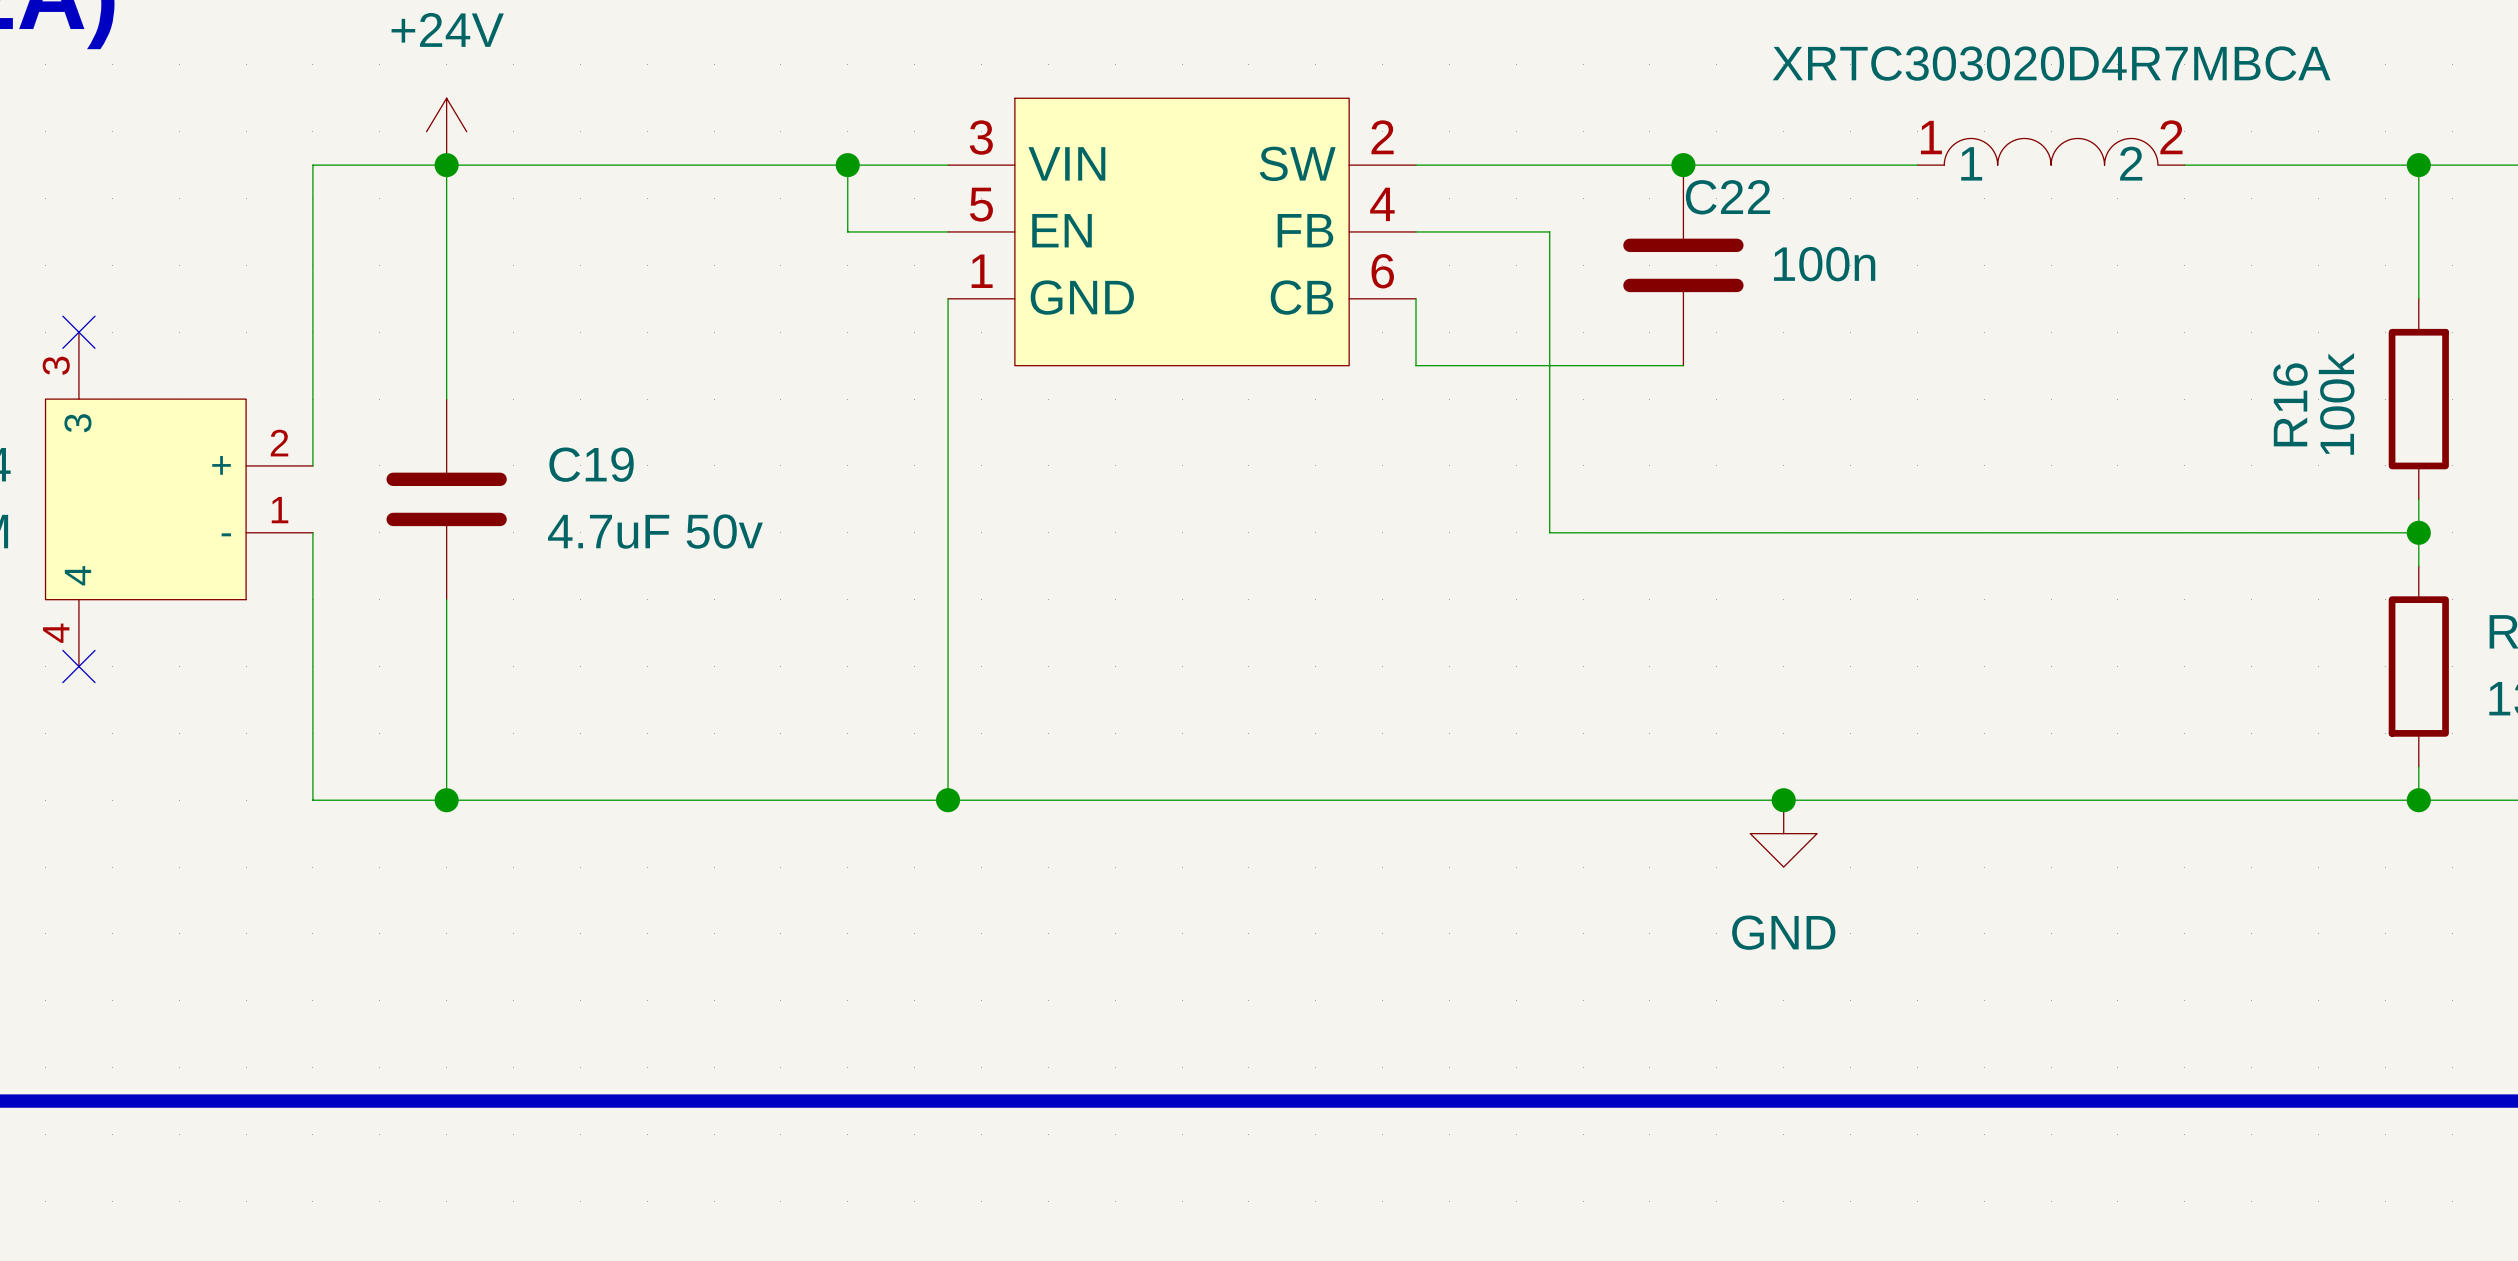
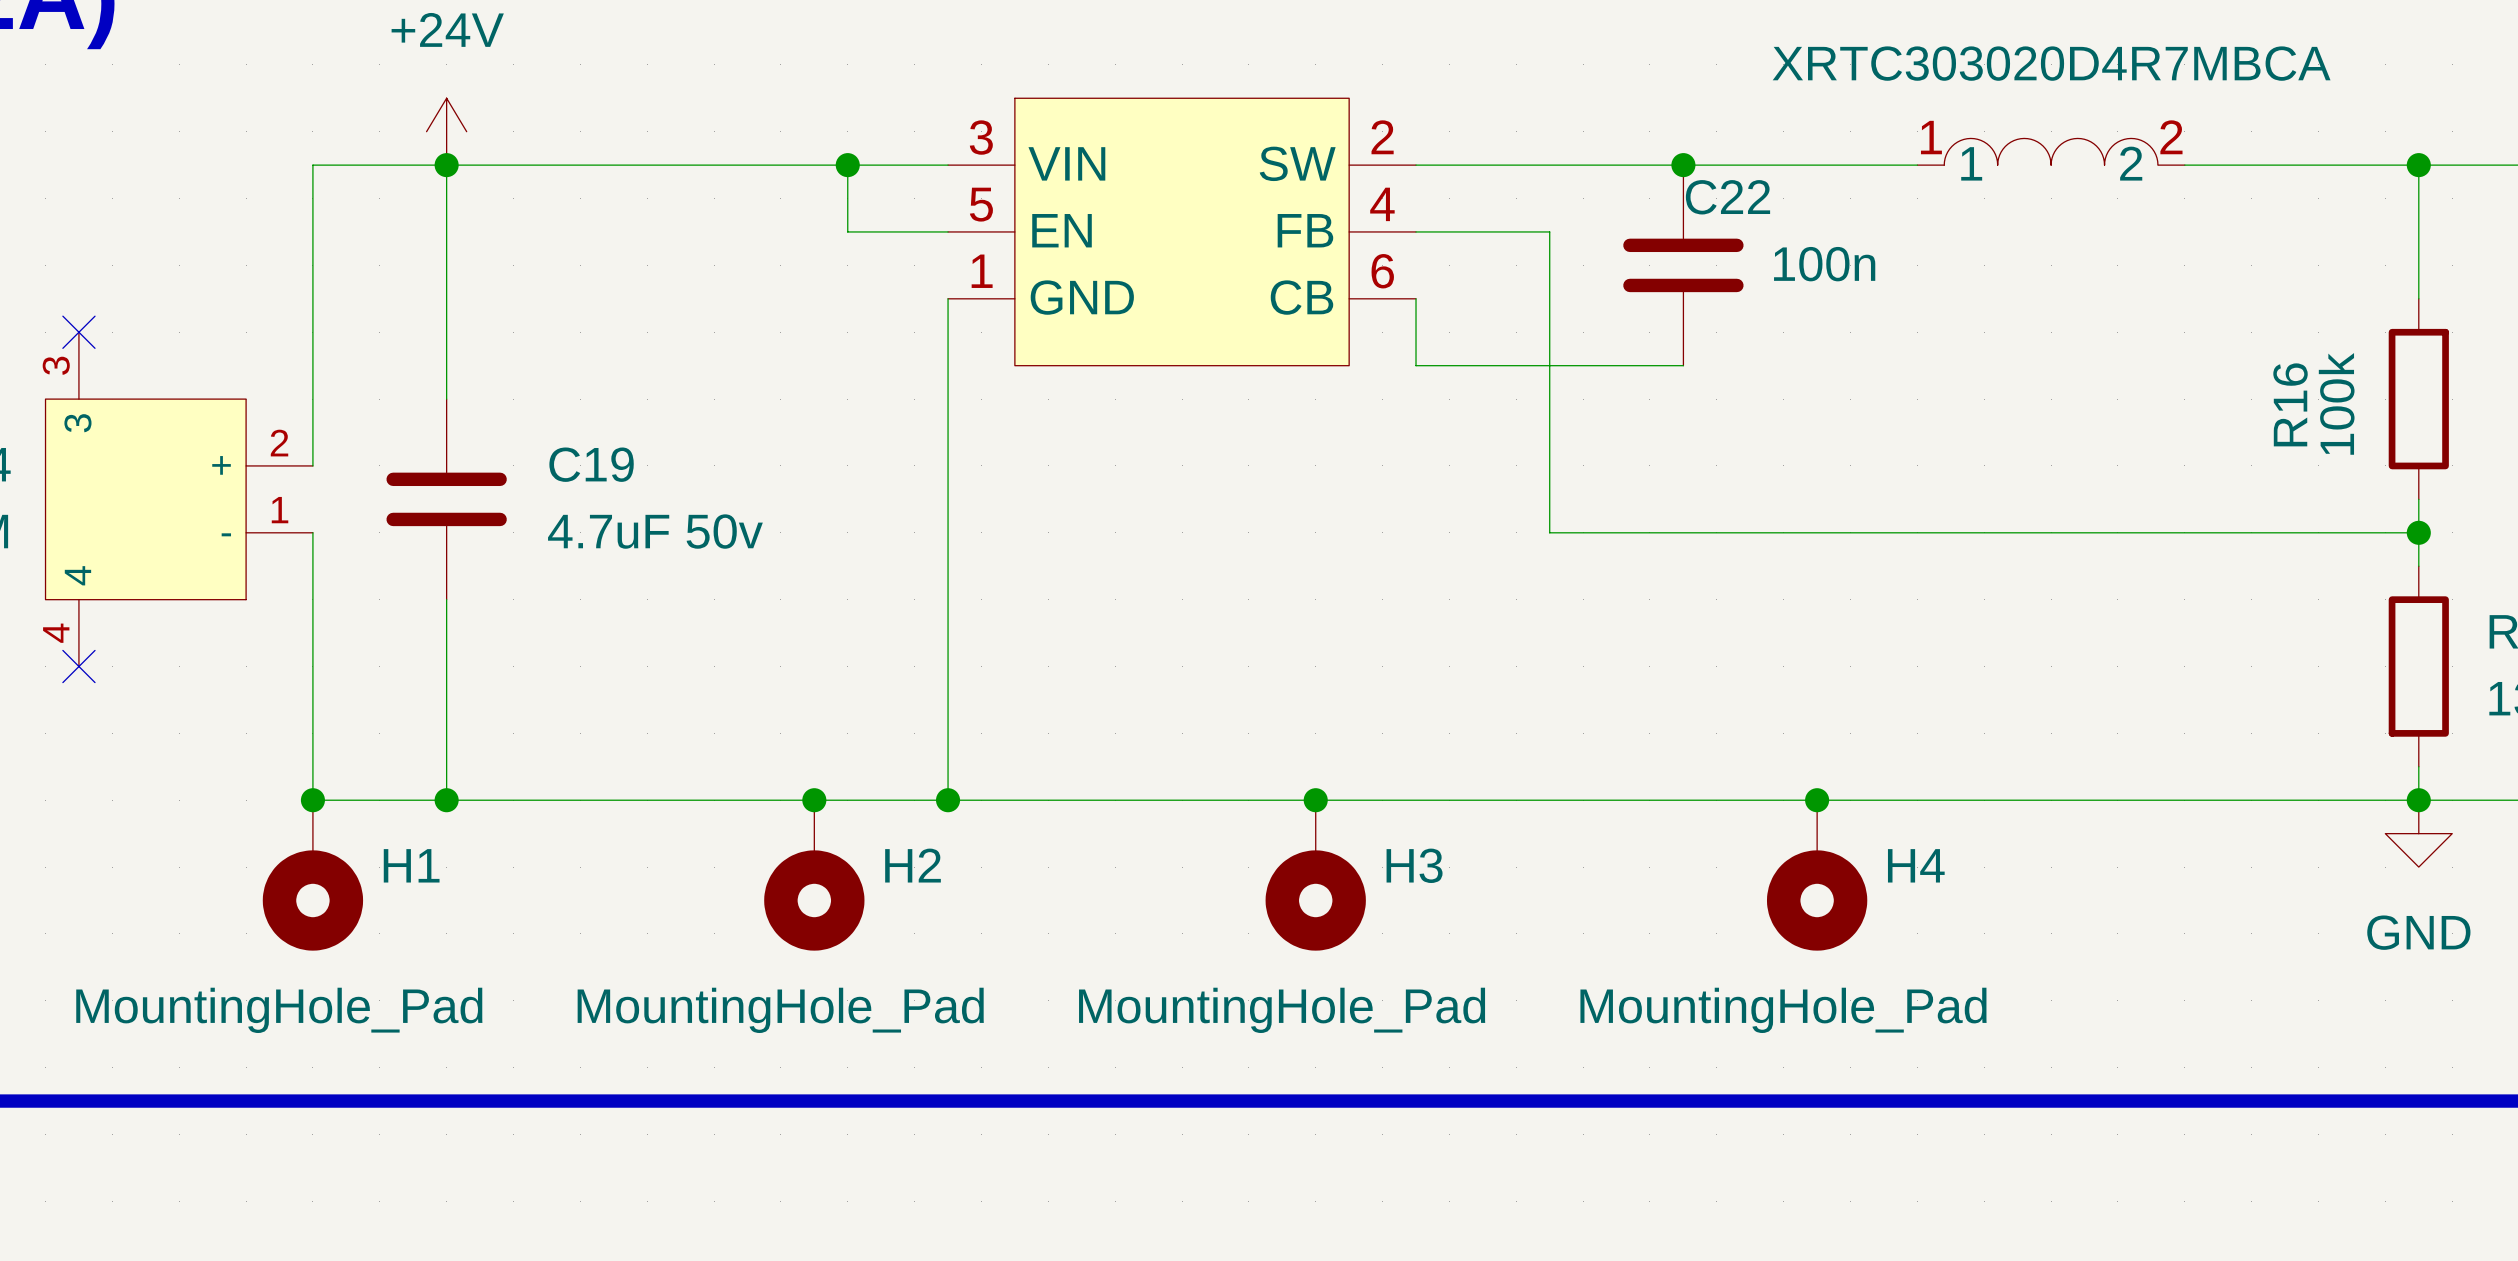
junction: none -> (312, 800)
junction: none -> (814, 800)
junction: none -> (1315, 800)
junction position: (1783, 800) -> (1817, 800)
power symbol position: GND (1783, 833) -> GND (2418, 833)
H1: none -> MountingHole_Pad (312, 875)
H2: none -> MountingHole_Pad (814, 875)
H3: none -> MountingHole_Pad (1315, 875)
H4: none -> MountingHole_Pad (1817, 875)

